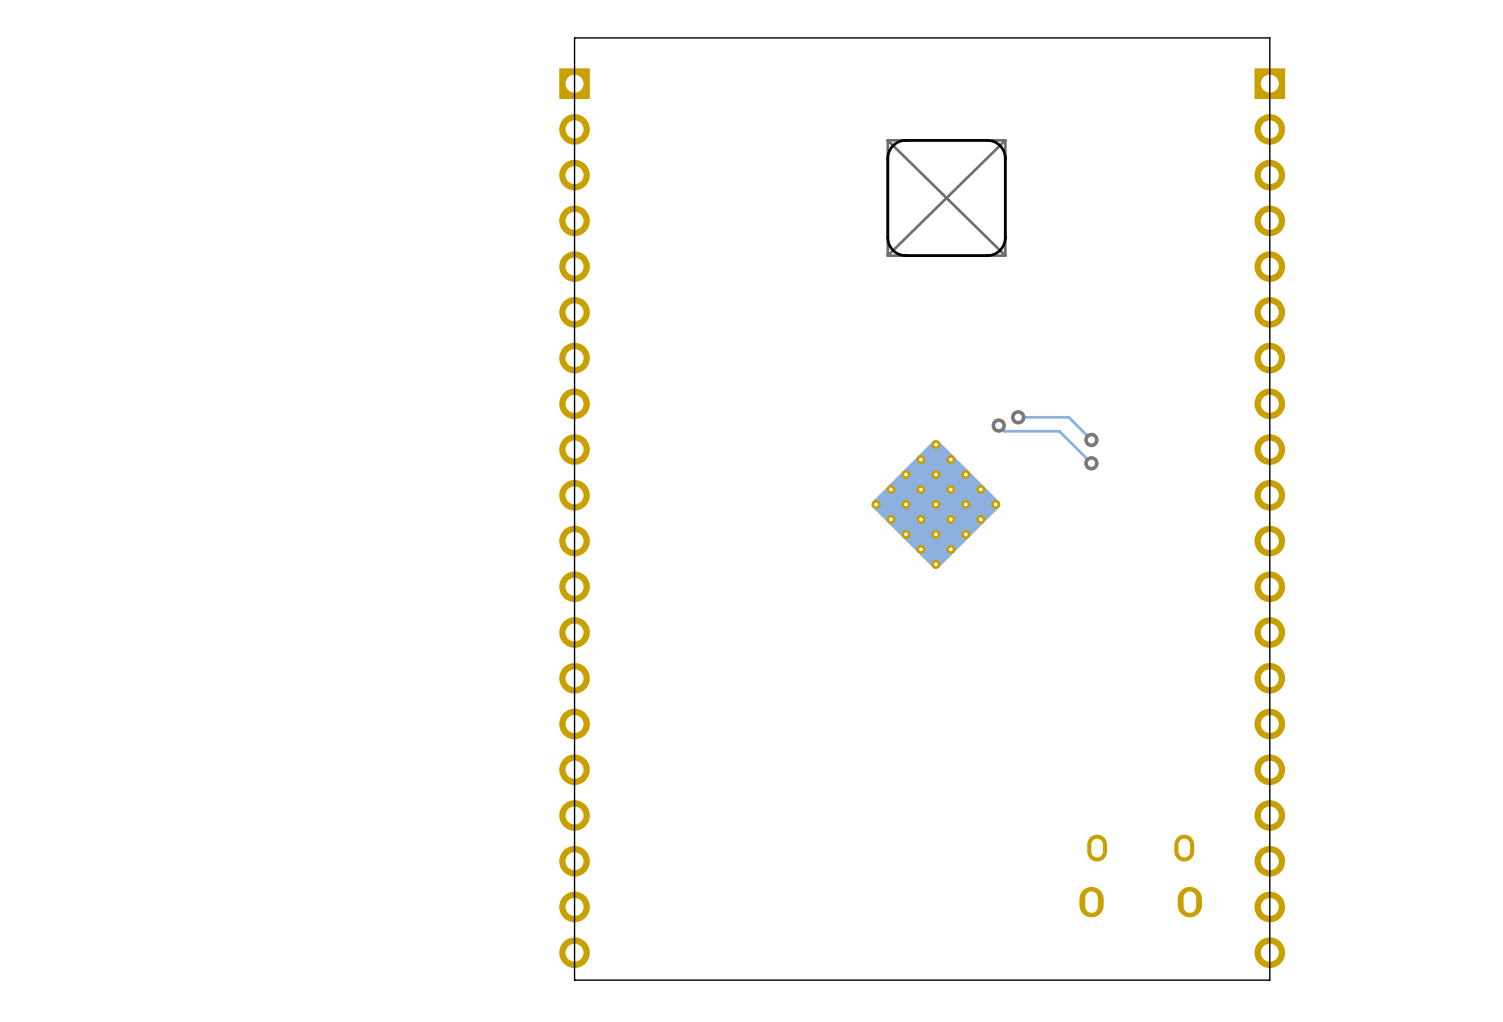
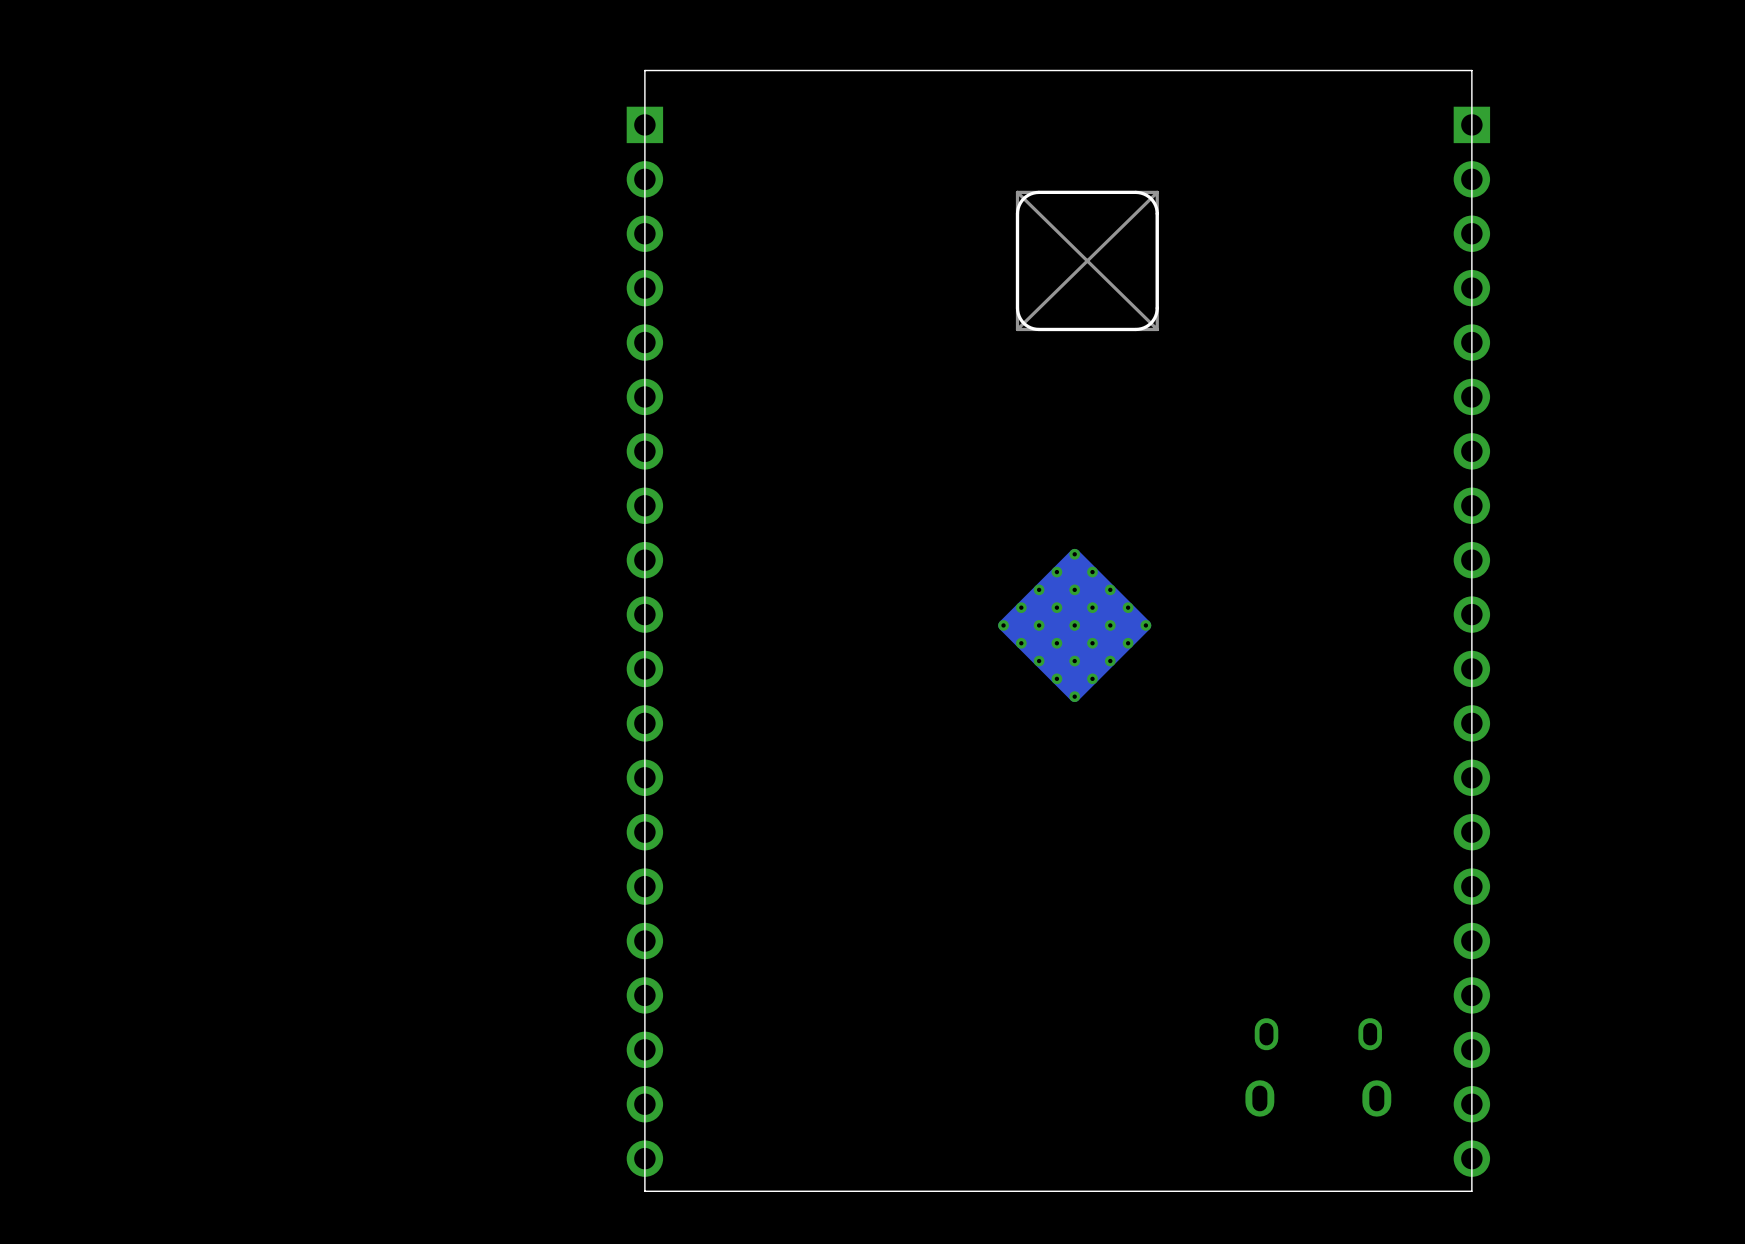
track: (1018, 417) (1068, 417) (1091, 439) -> none
via: (1018, 417) -> none
track: (998, 425) (1004, 431) (1059, 431) (1091, 463) -> none
via: (998, 425) -> none
via: (1091, 439) -> none
via: (1091, 463) -> none

